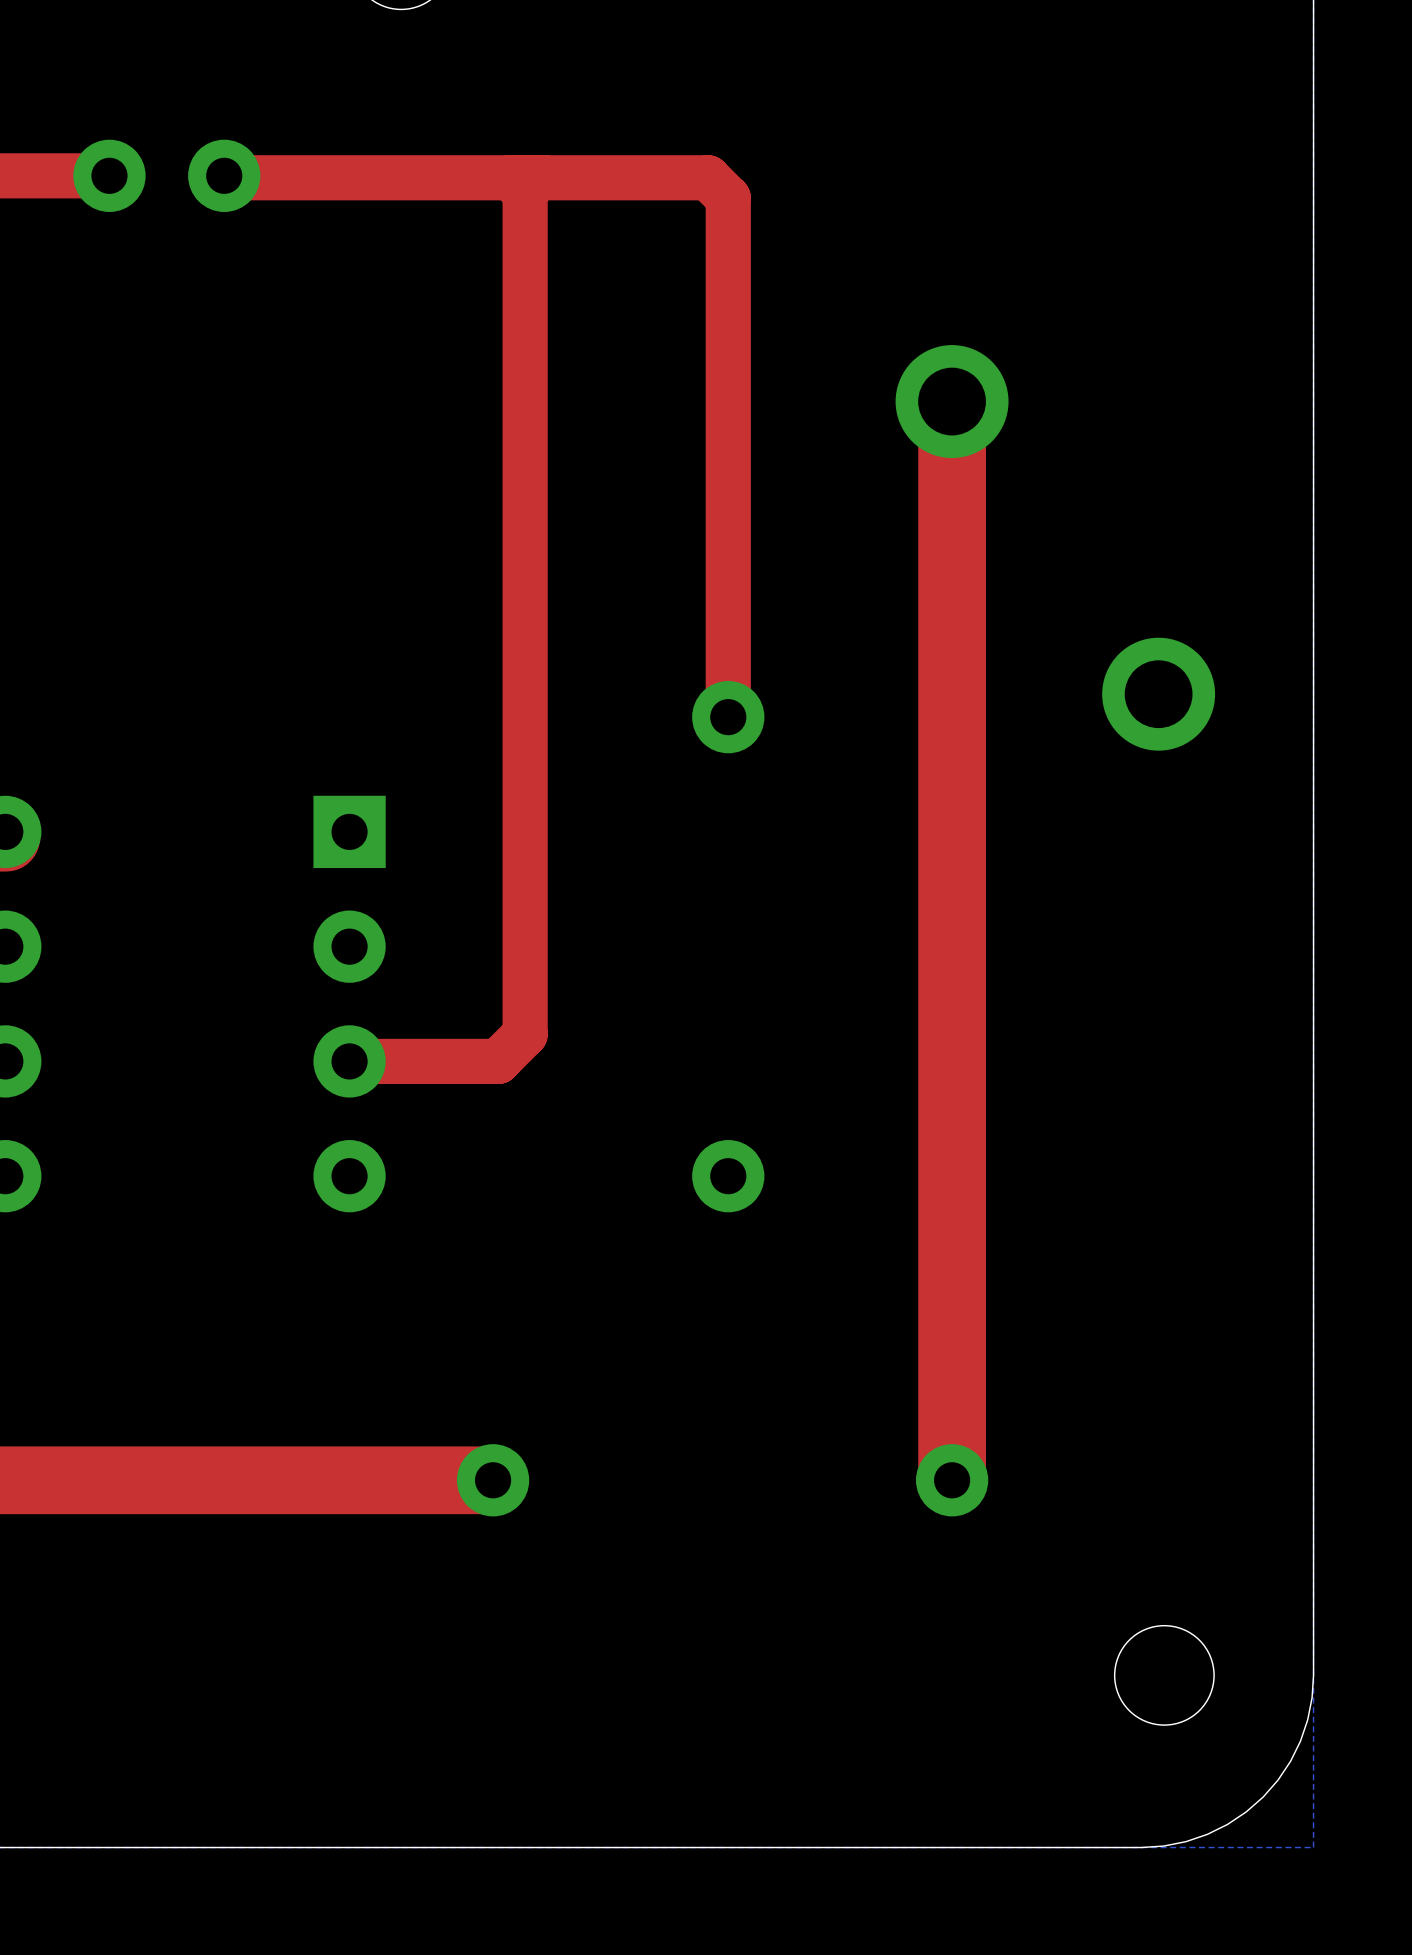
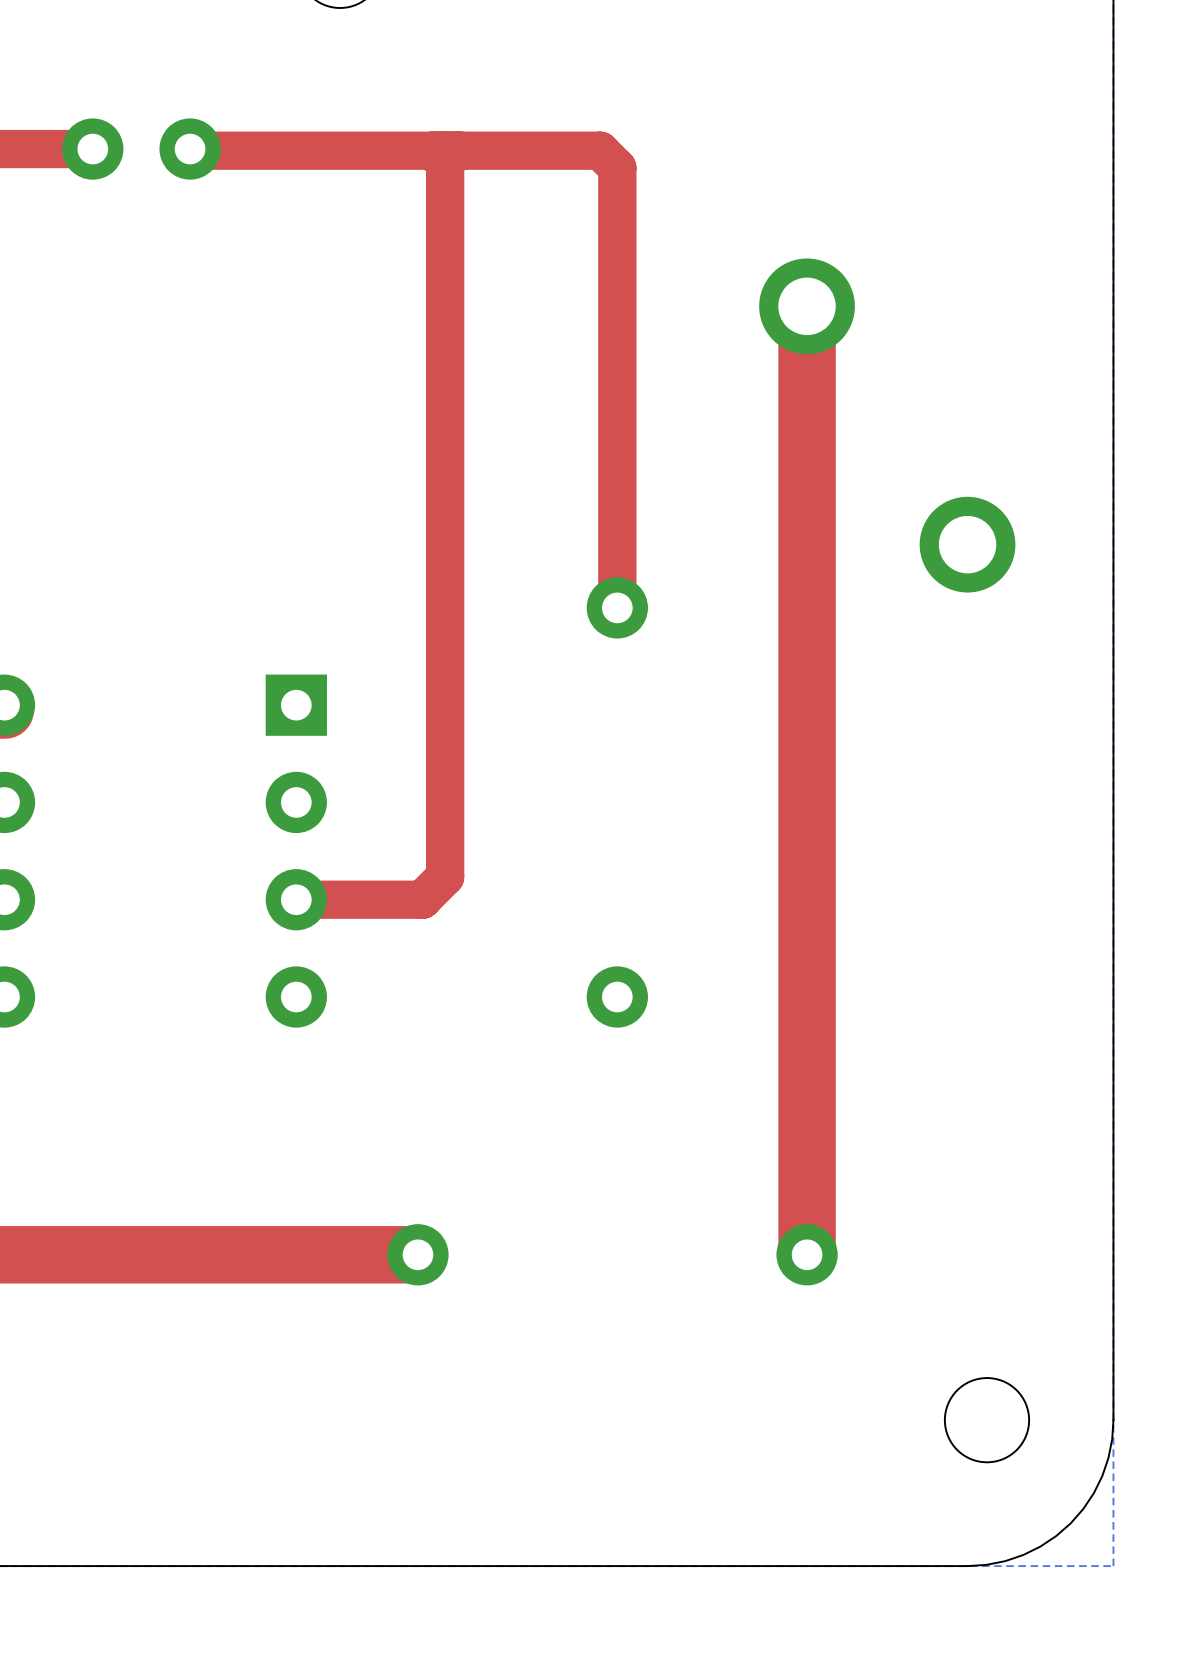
part position: (952, 401) -> (807, 306)
part position: (1158, 694) -> (967, 544)

